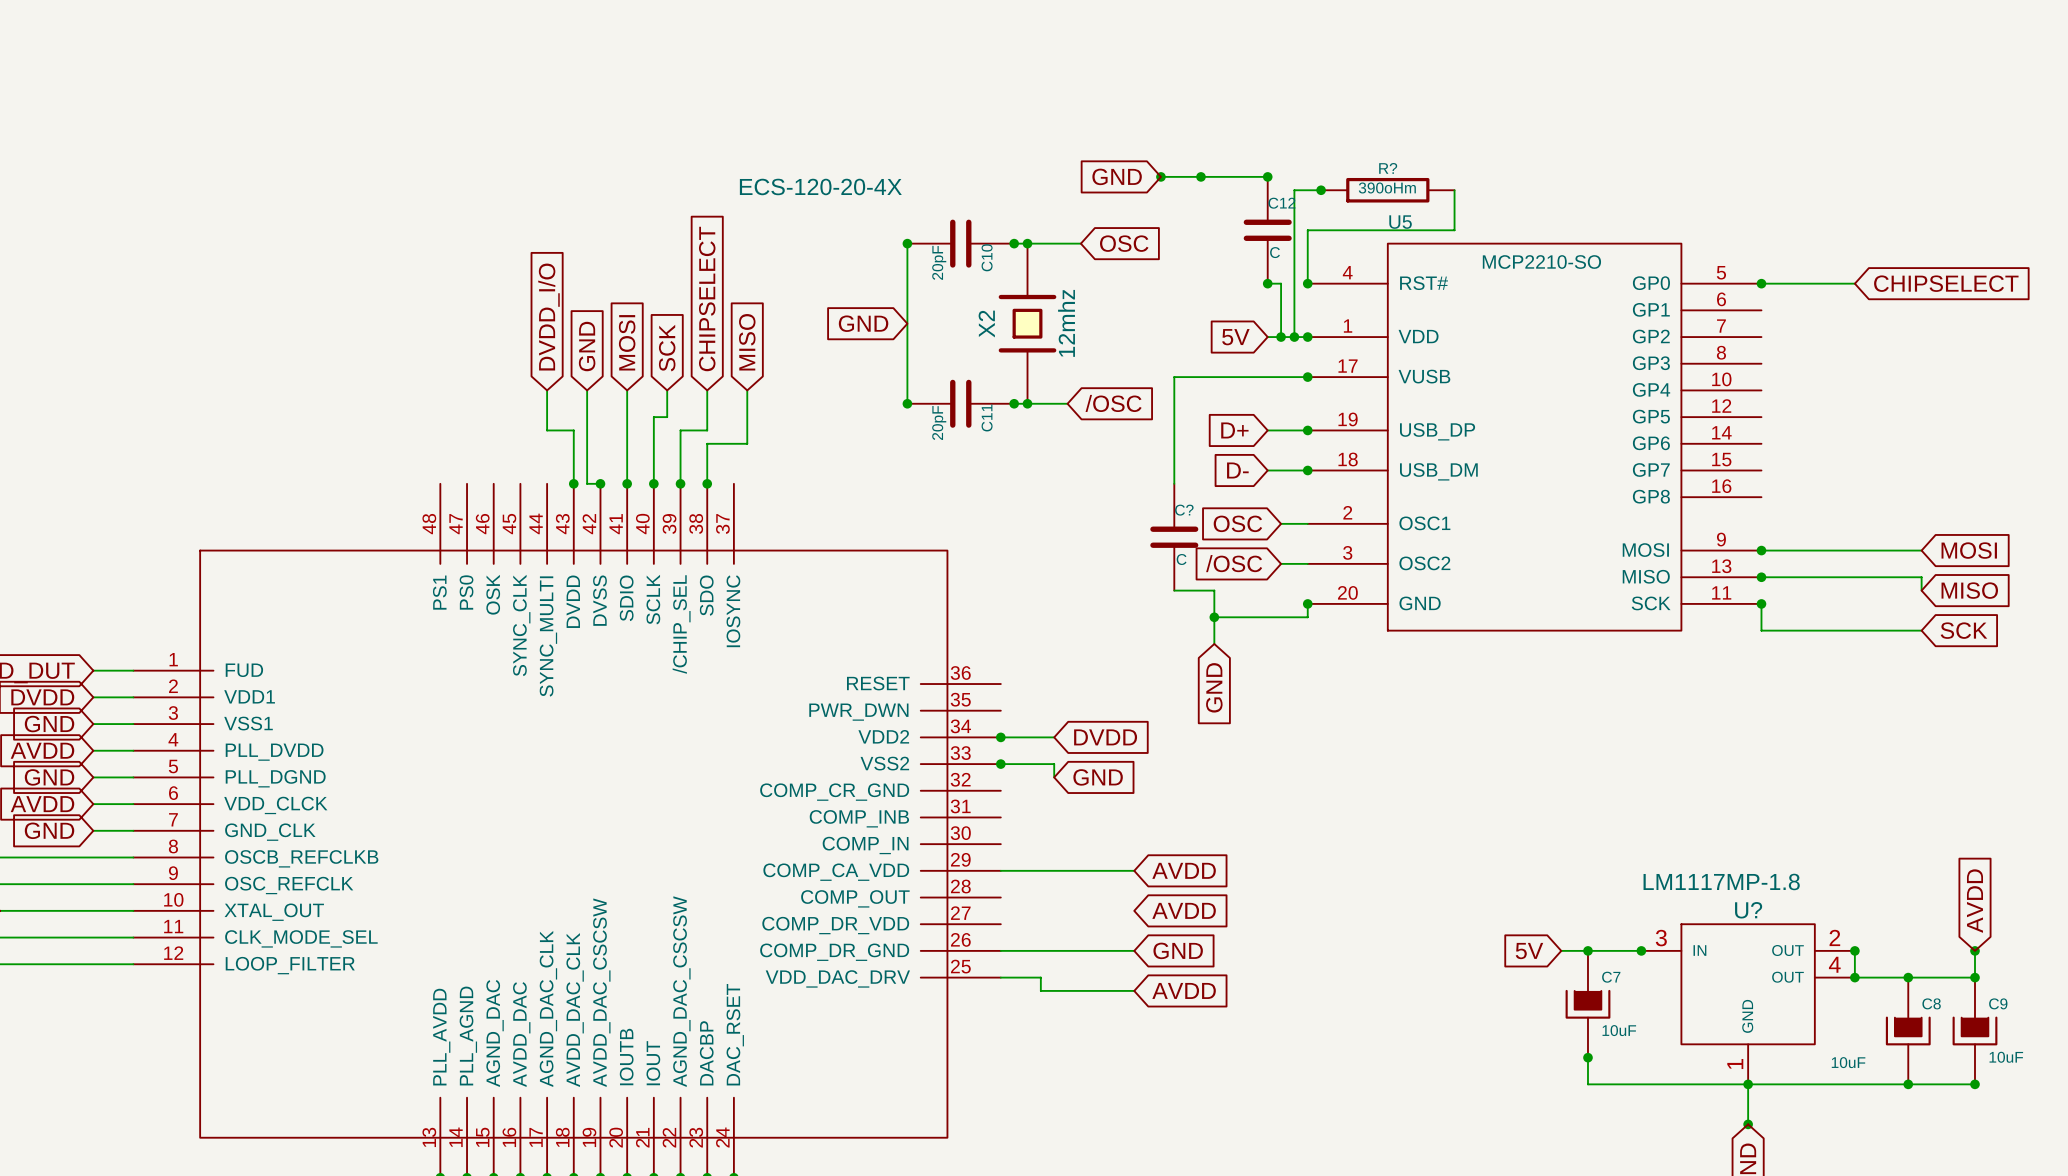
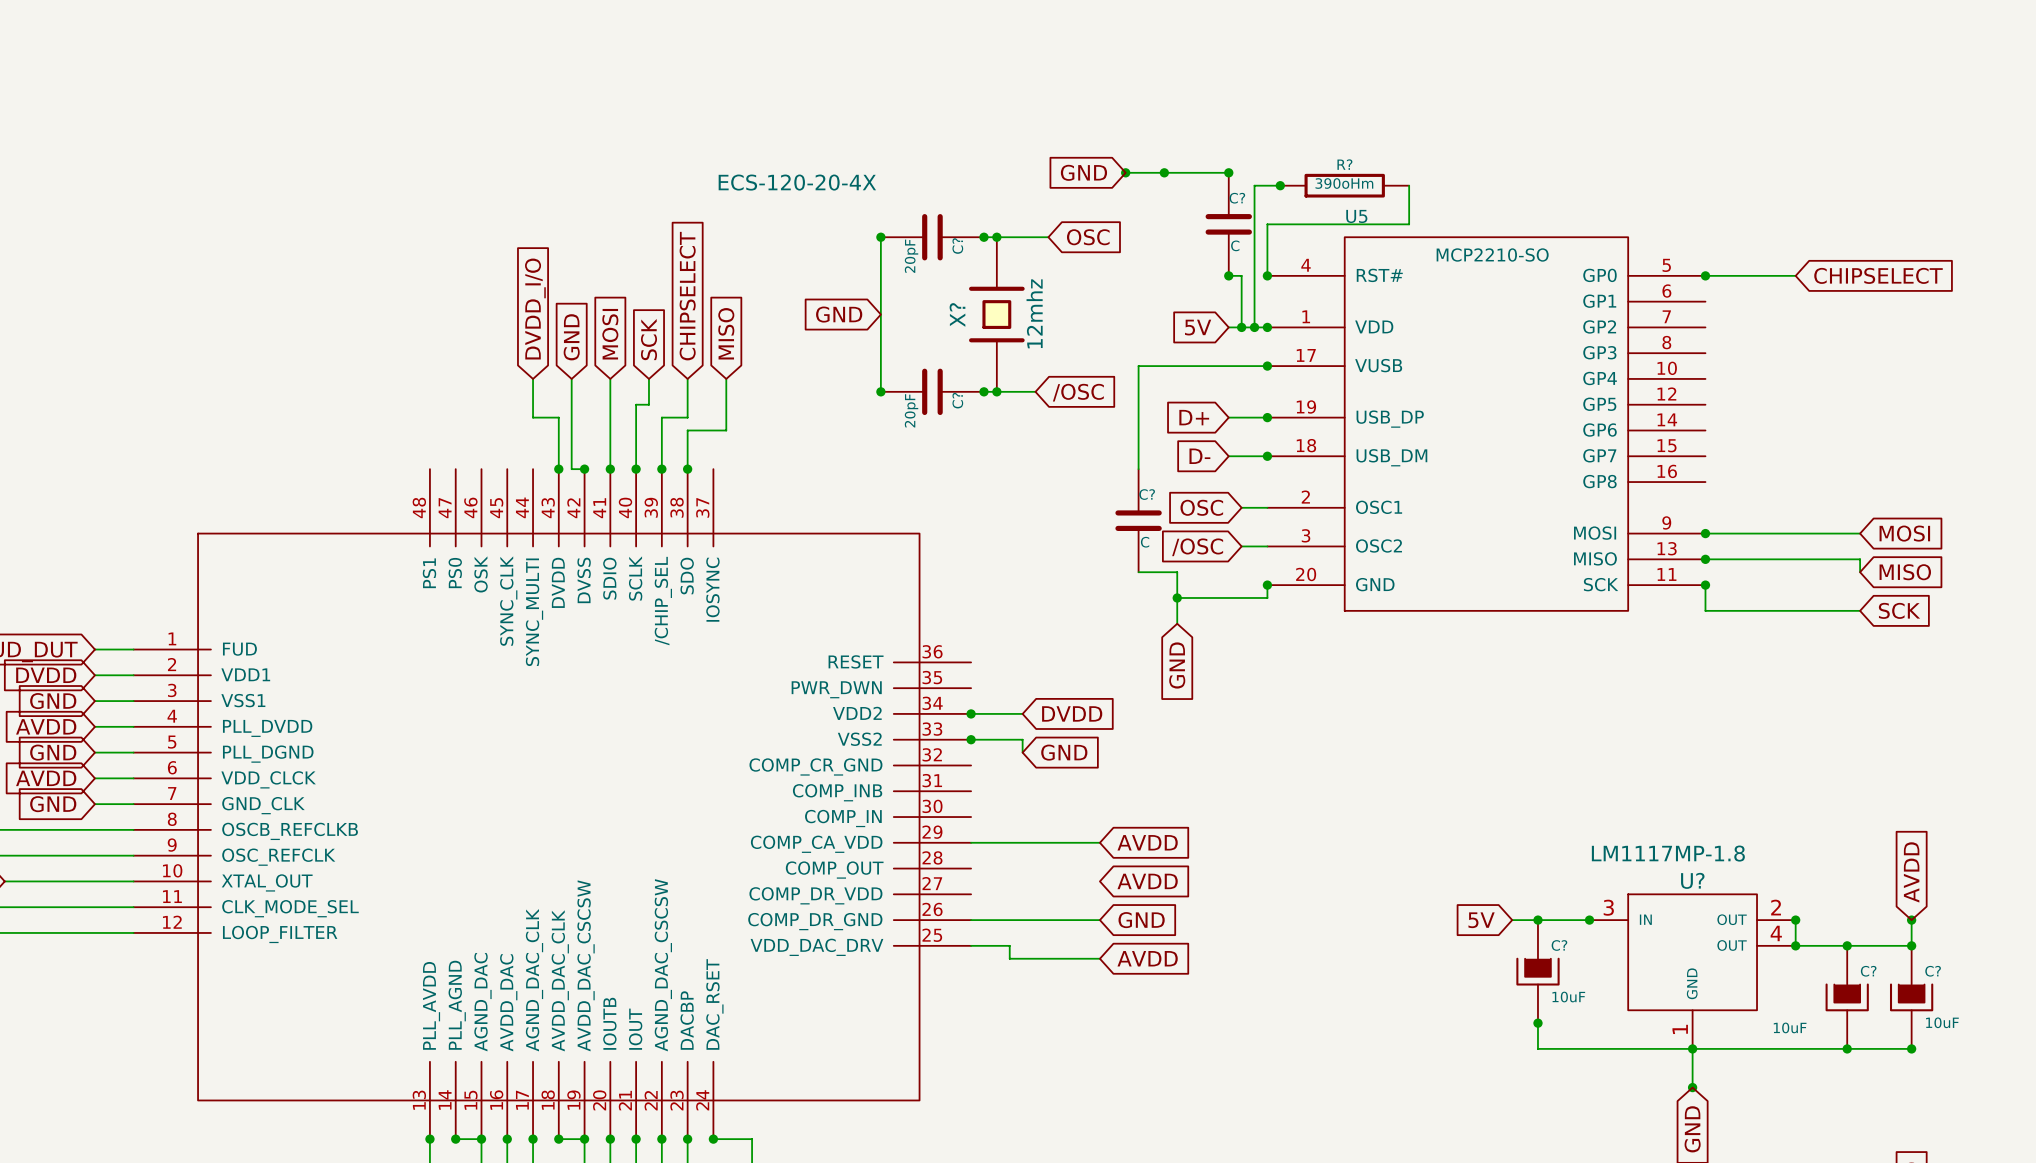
C12 name: C12 (1281, 203) -> C? (1237, 198)
C10 name: C10 (987, 257) -> C? (957, 246)
X2 name: X2 (986, 324) -> X? (957, 314)
C11 name: C11 (987, 417) -> C? (957, 400)
C7 name: C7 (1611, 977) -> C? (1559, 945)
C8 name: C8 (1931, 1003) -> C? (1868, 971)
C9 name: C9 (1998, 1003) -> C? (1933, 971)

